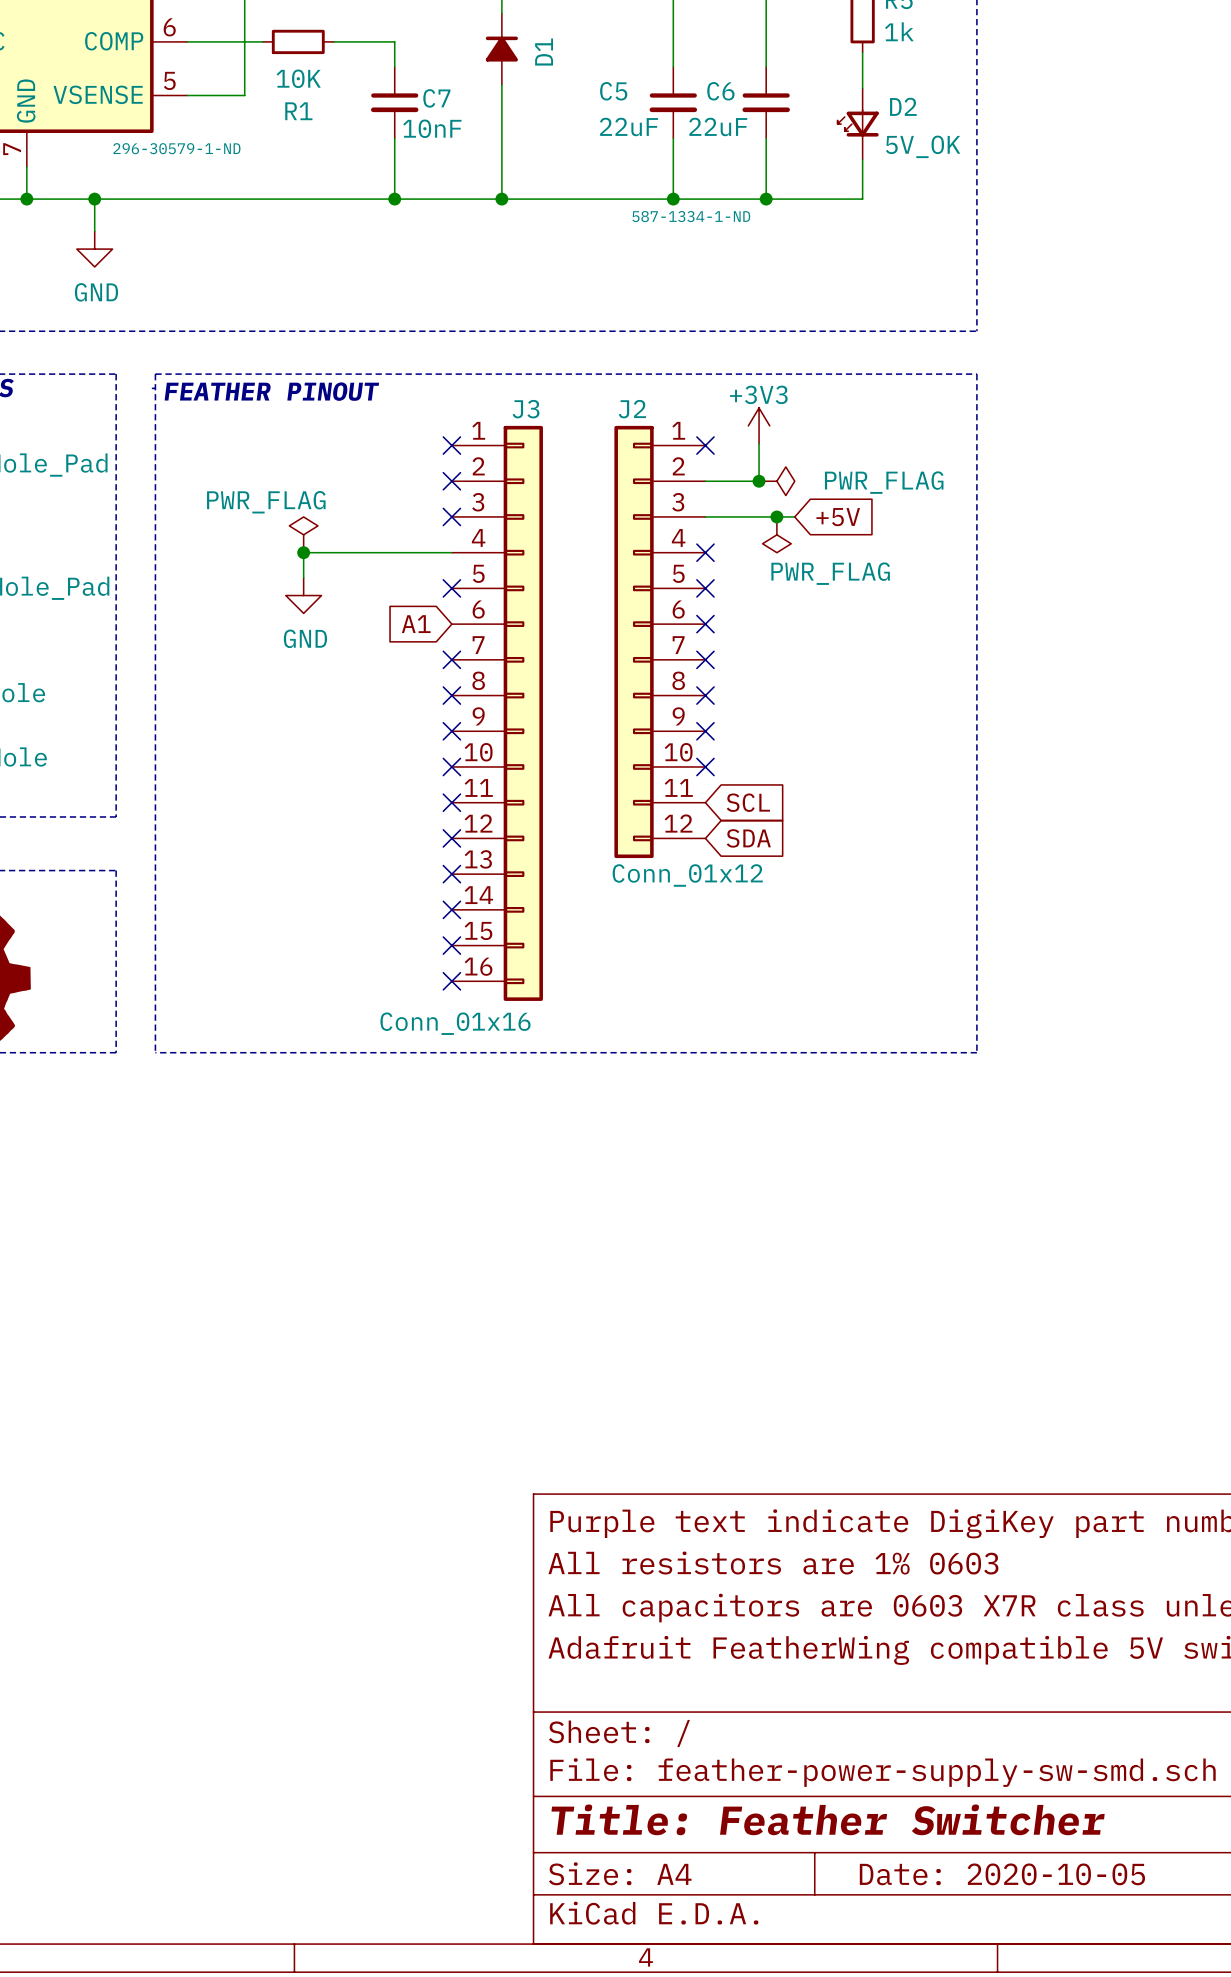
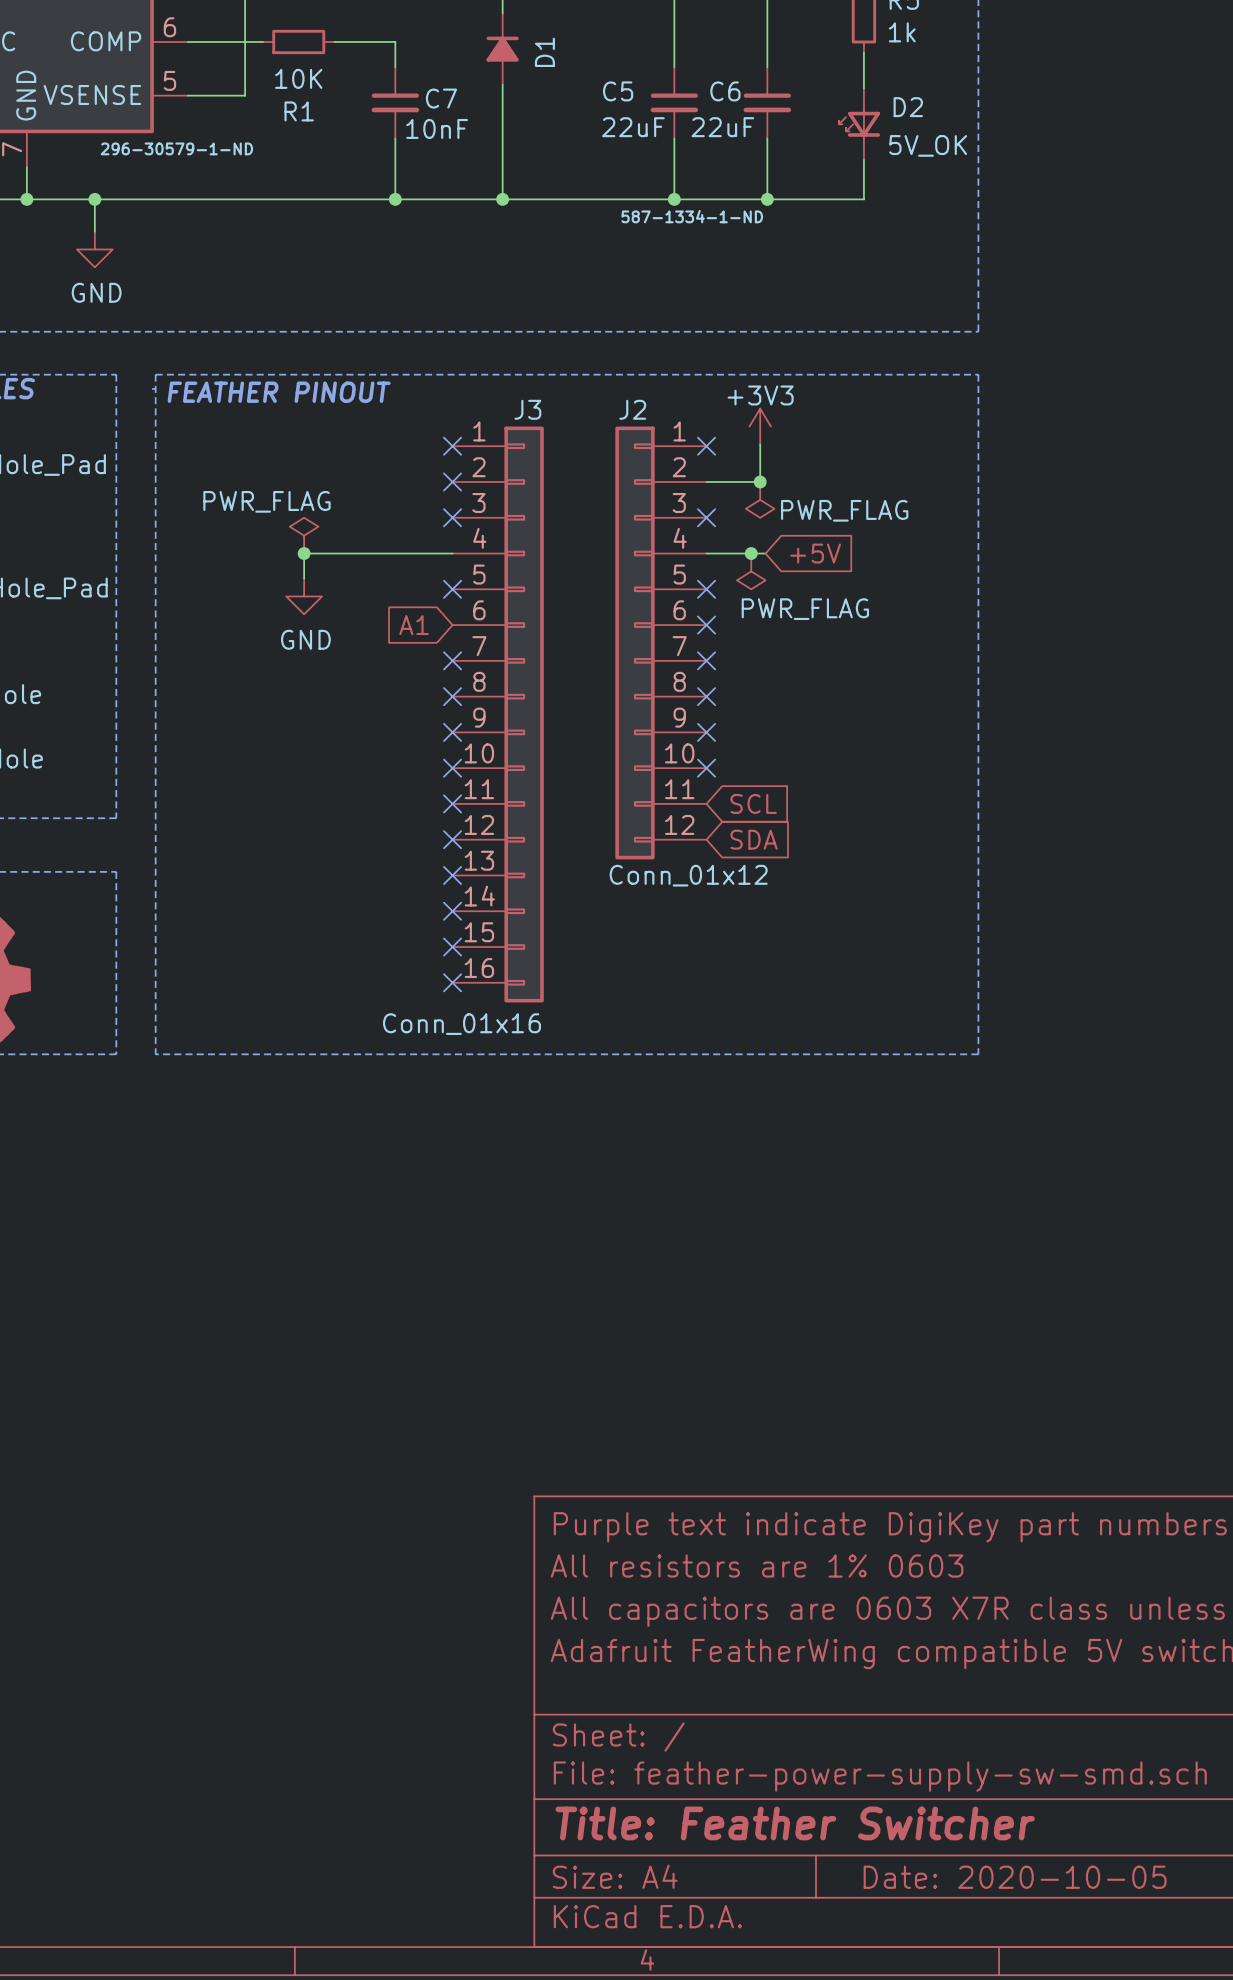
power symbol: PWR_FLAG (776, 481) -> none
power symbol: none -> PWR_FLAG (760, 499)
wire: (705, 516) (794, 516) -> none
junction position: (776, 516) -> (751, 553)
global label position: +5V (838, 517) -> +5V (815, 553)
power symbol: PWR_FLAG (776, 534) -> none
wire: none -> (706, 553) (765, 553)
no-connect mark position: (705, 552) -> (706, 517)
power symbol: none -> PWR_FLAG (751, 571)

